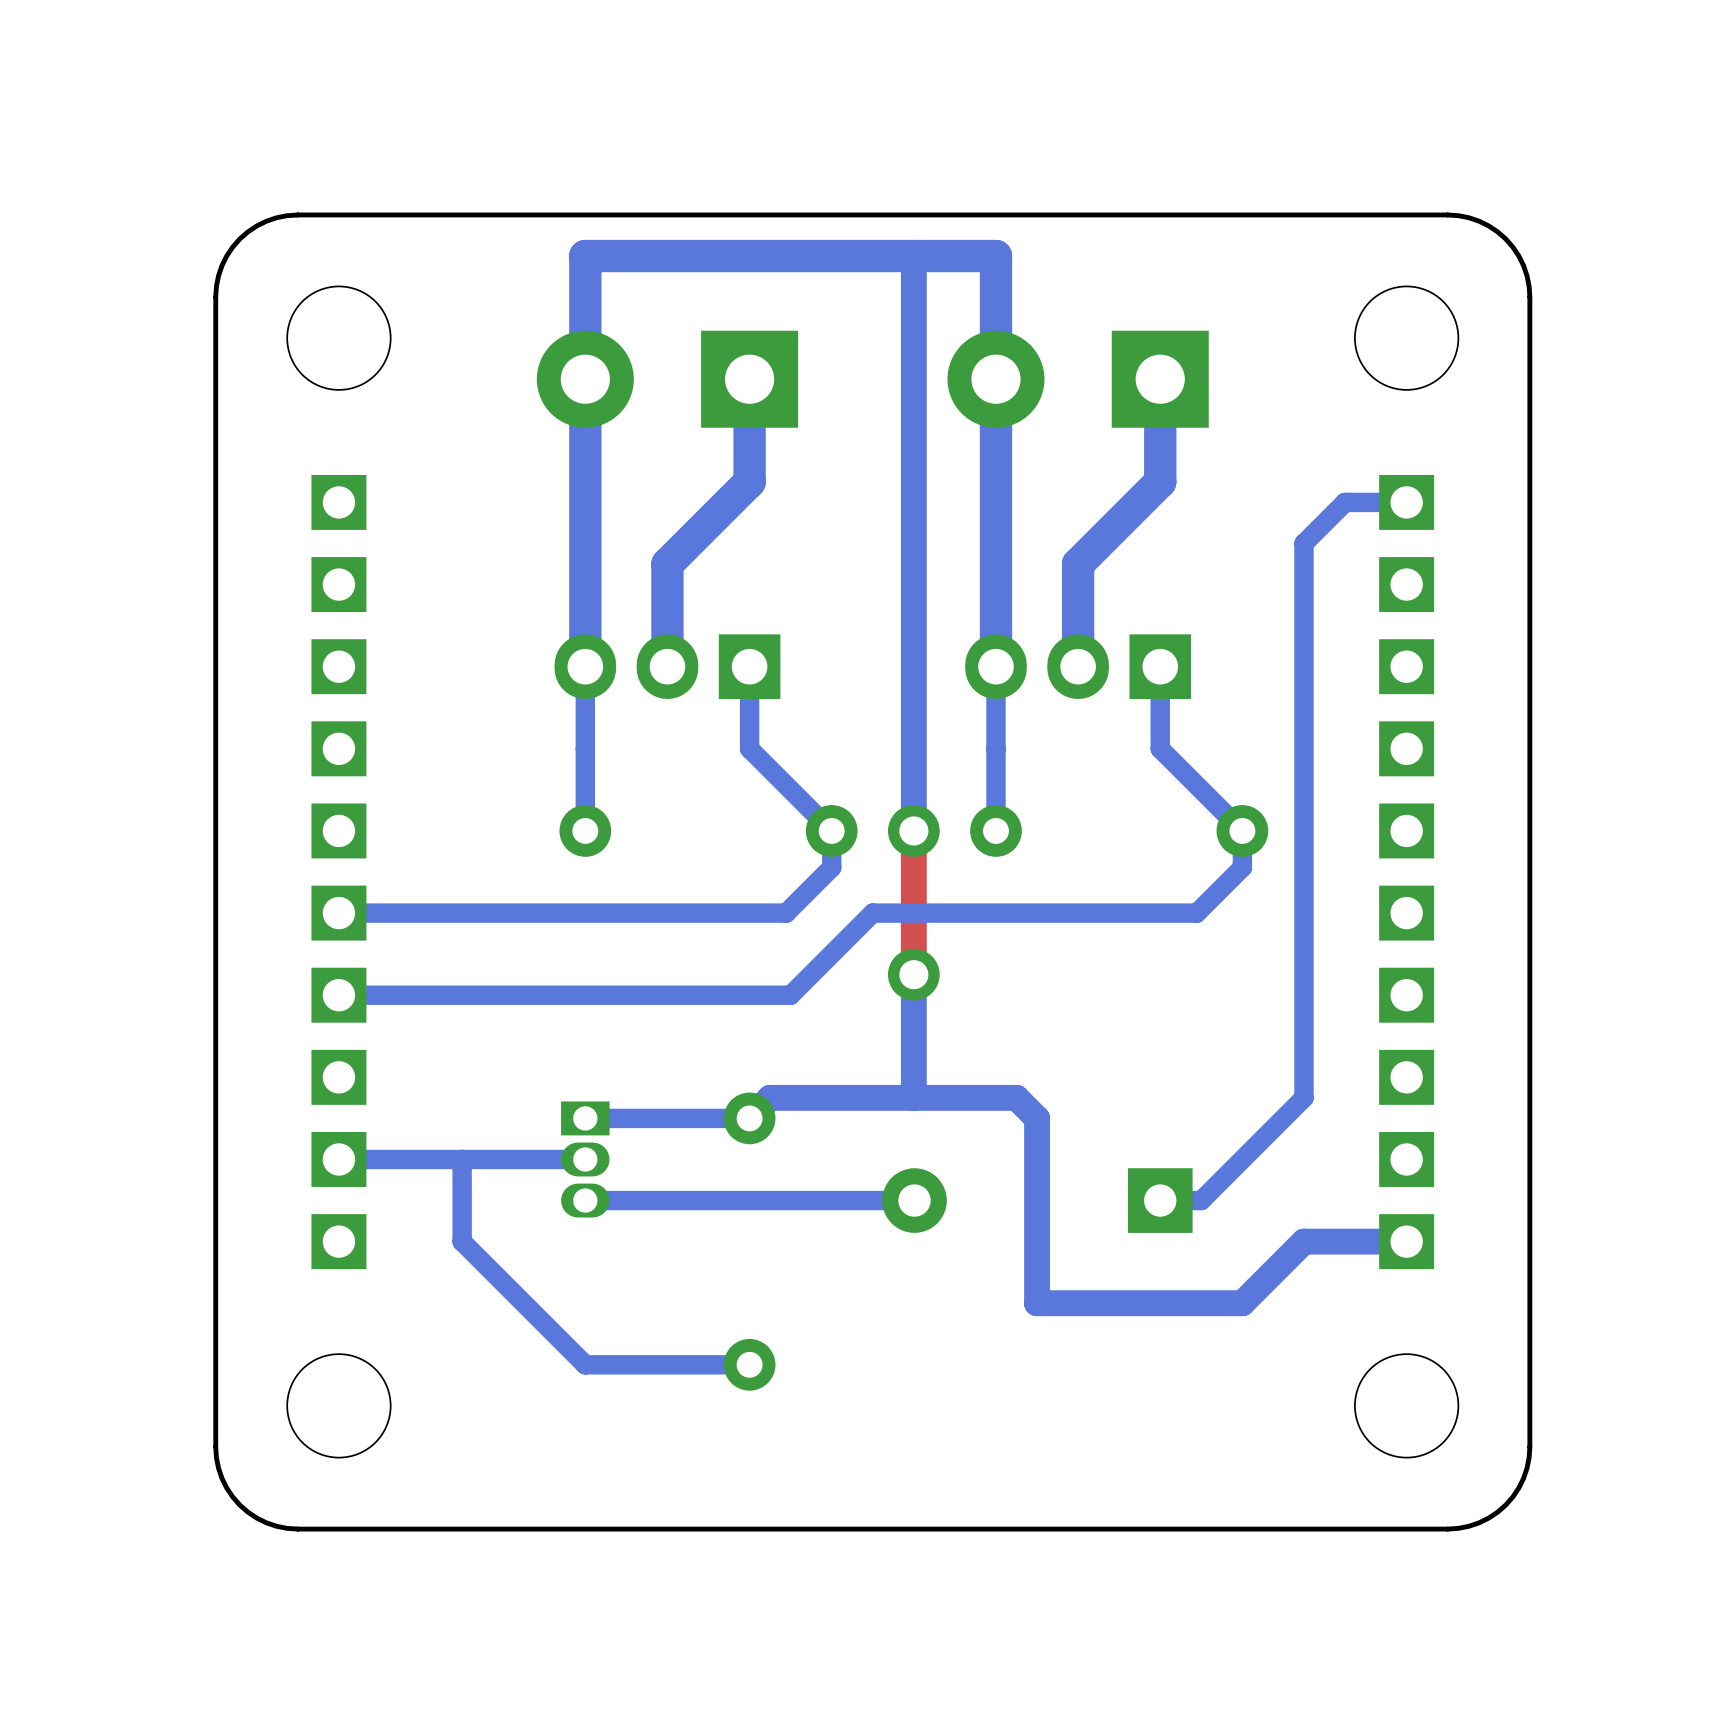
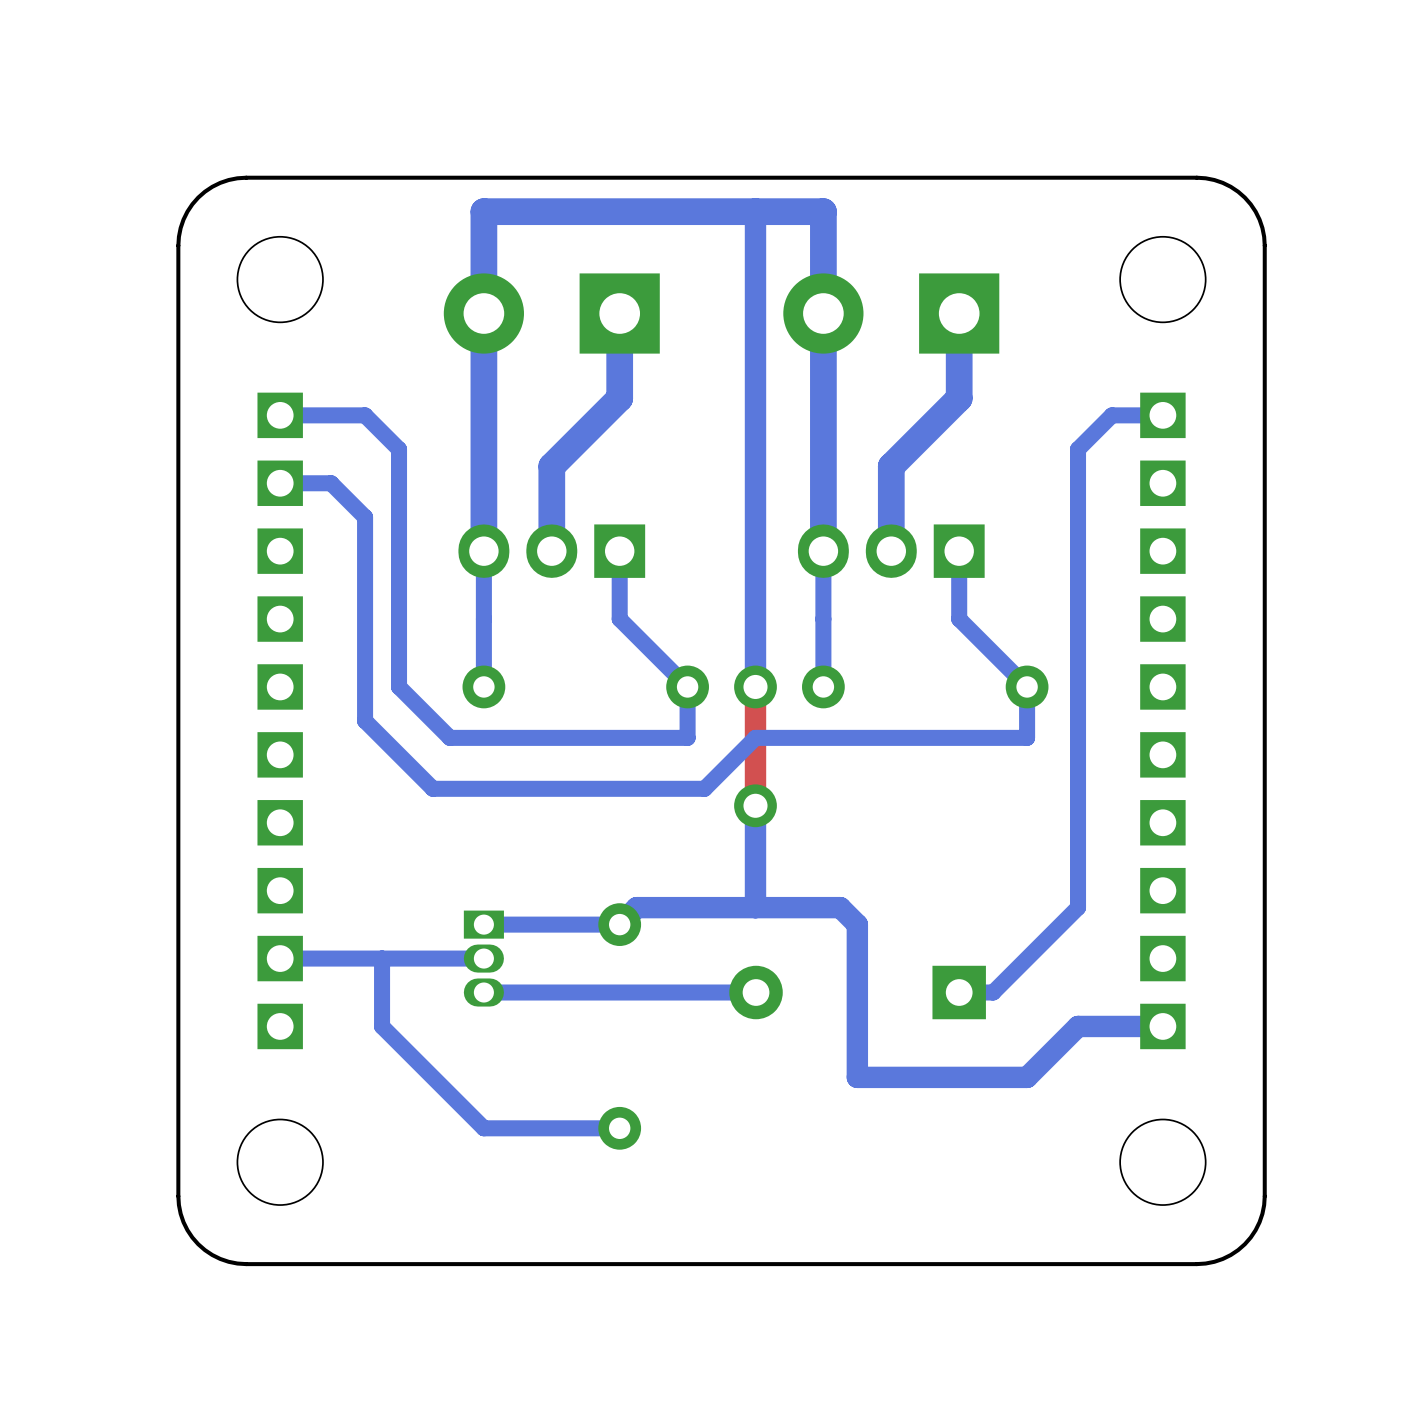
bottom track: (831, 867) (786, 913) (338, 913) -> (687, 717) (687, 737) (449, 737) (399, 686) (399, 449) (365, 415) (280, 415)
bottom track: (1242, 867) (1196, 913) (872, 913) (790, 995) (338, 995) -> (1027, 717) (1027, 737) (755, 737) (704, 788) (432, 788) (365, 720) (365, 517) (331, 483) (280, 483)

